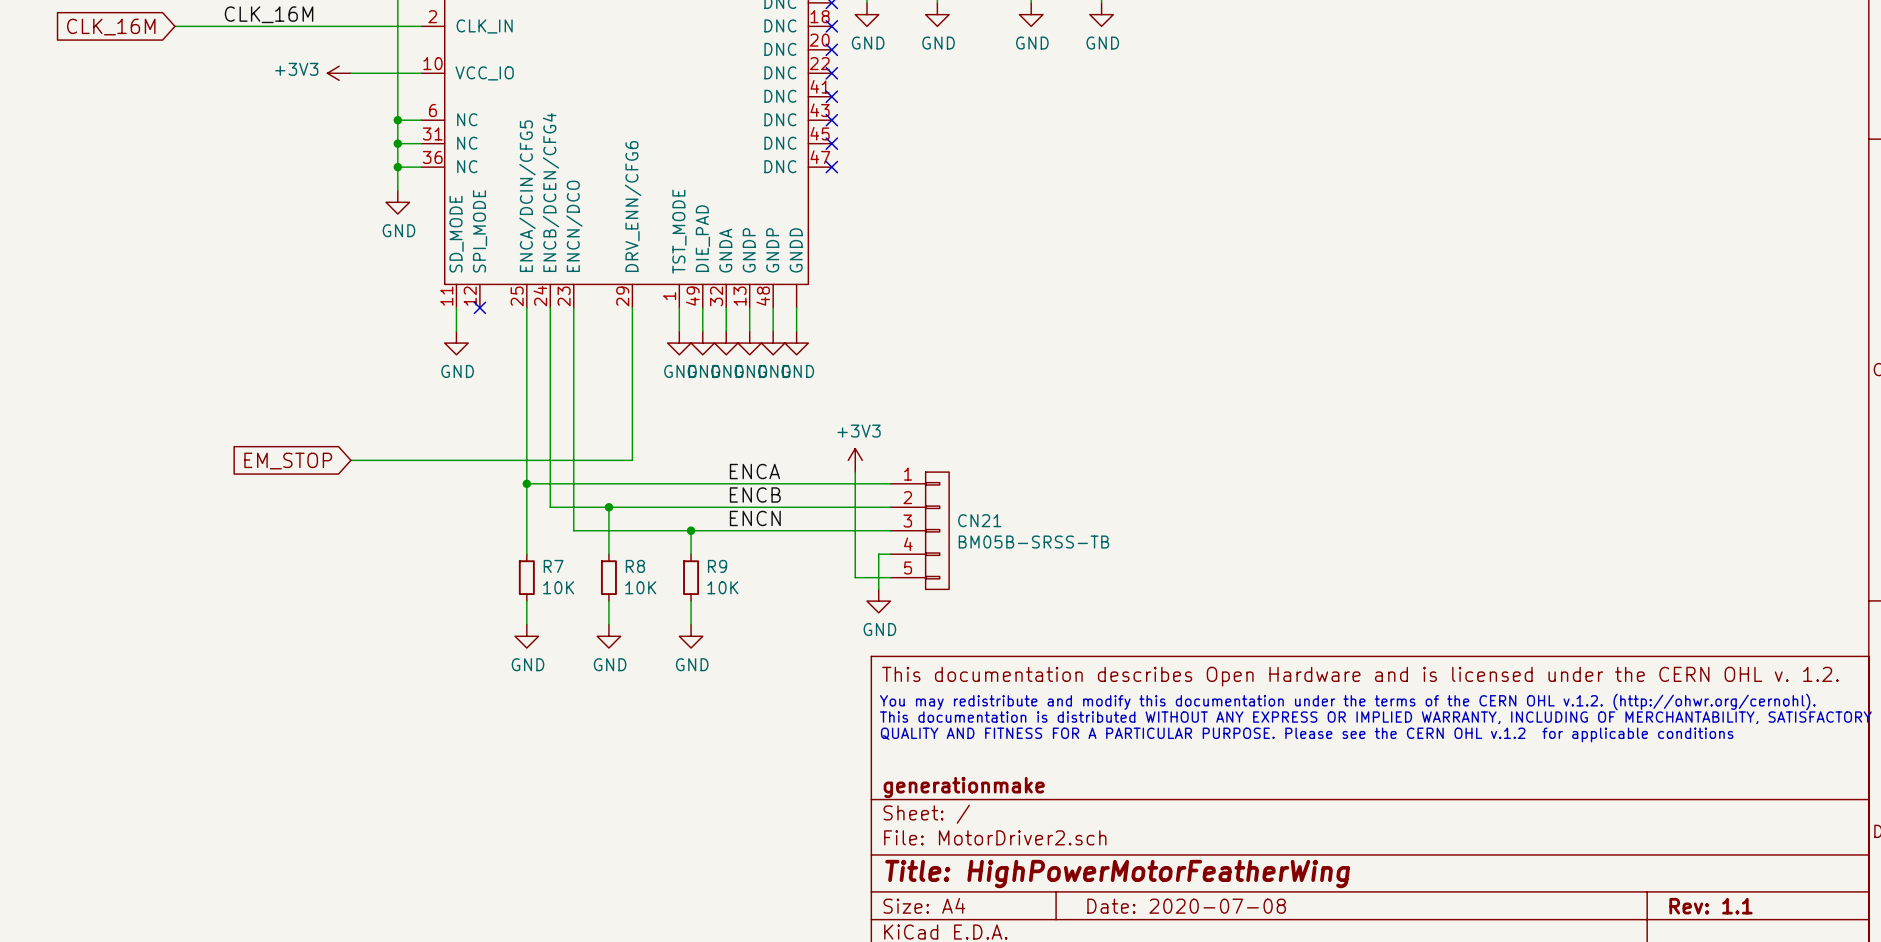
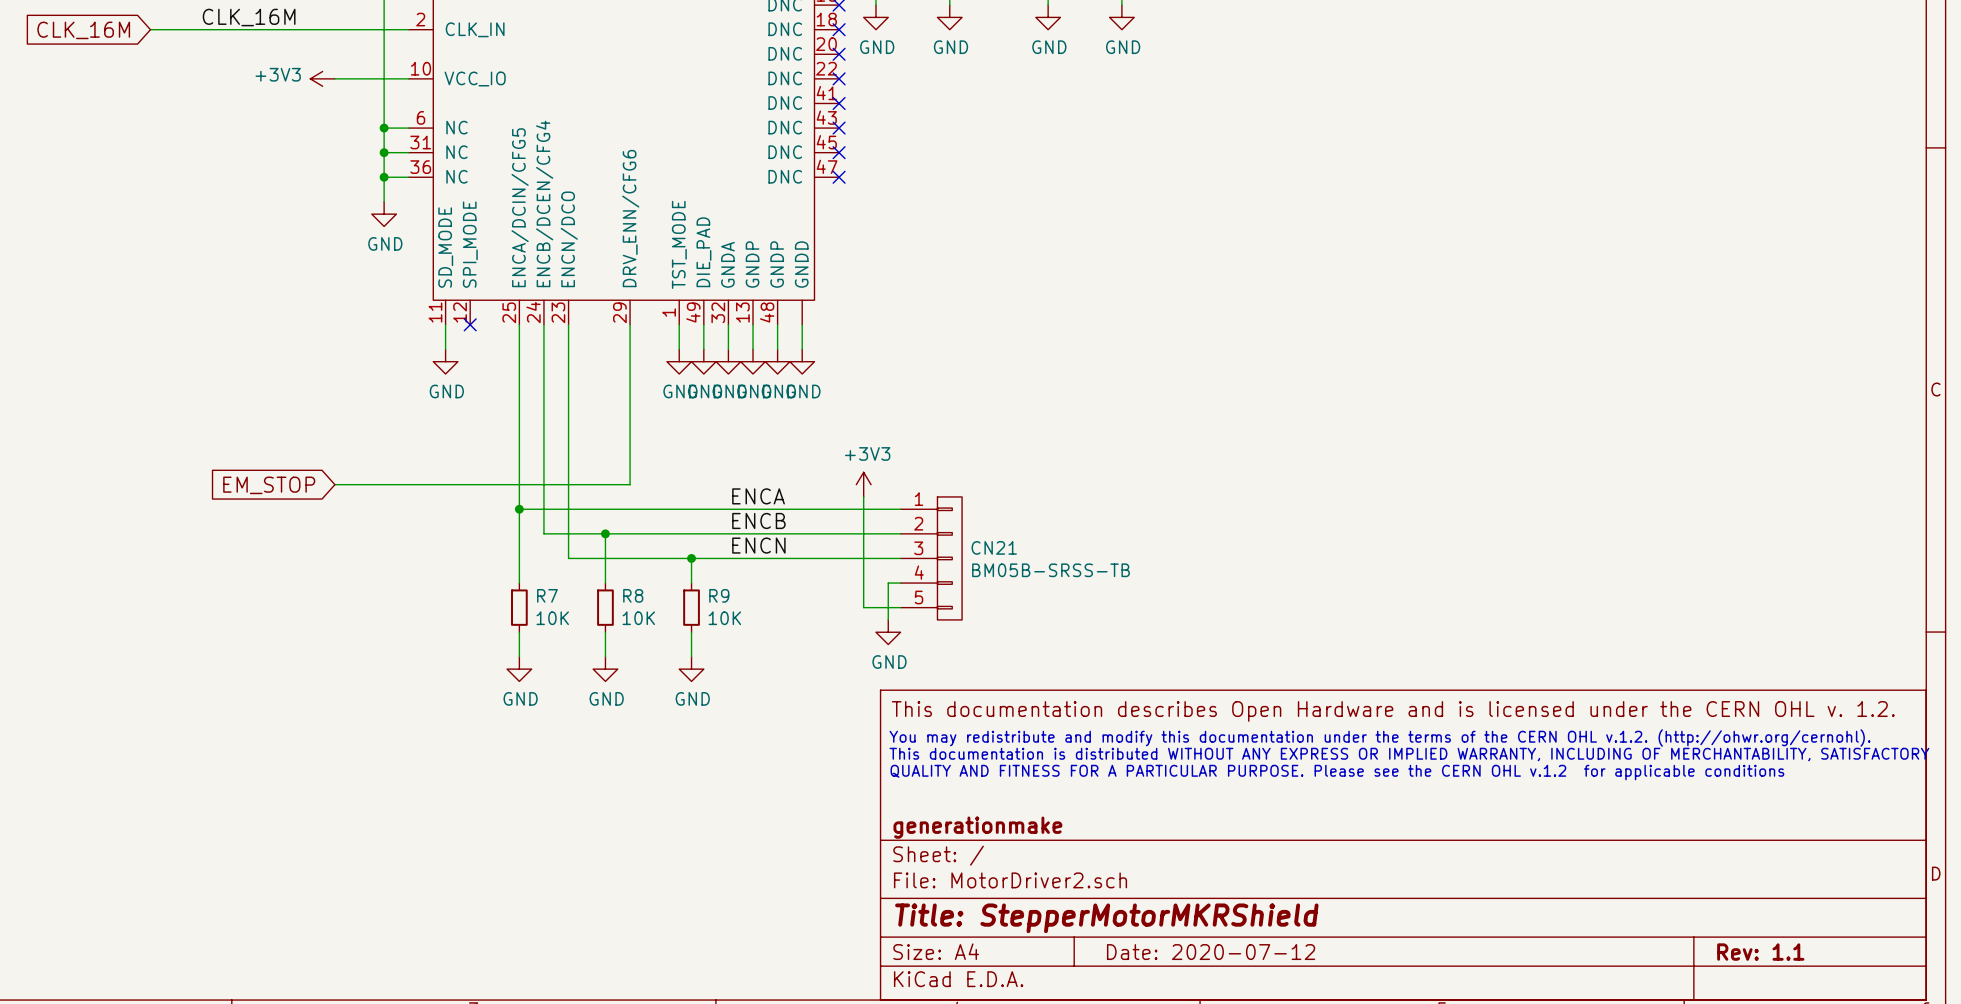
title block: Title: HighPowerMotorFeatherWing (1117, 873) -> Title: StepperMotorMKRShield (1106, 918)
title block: Date: 2020-07-08 (1186, 906) -> Date: 2020-07-12 (1211, 952)

